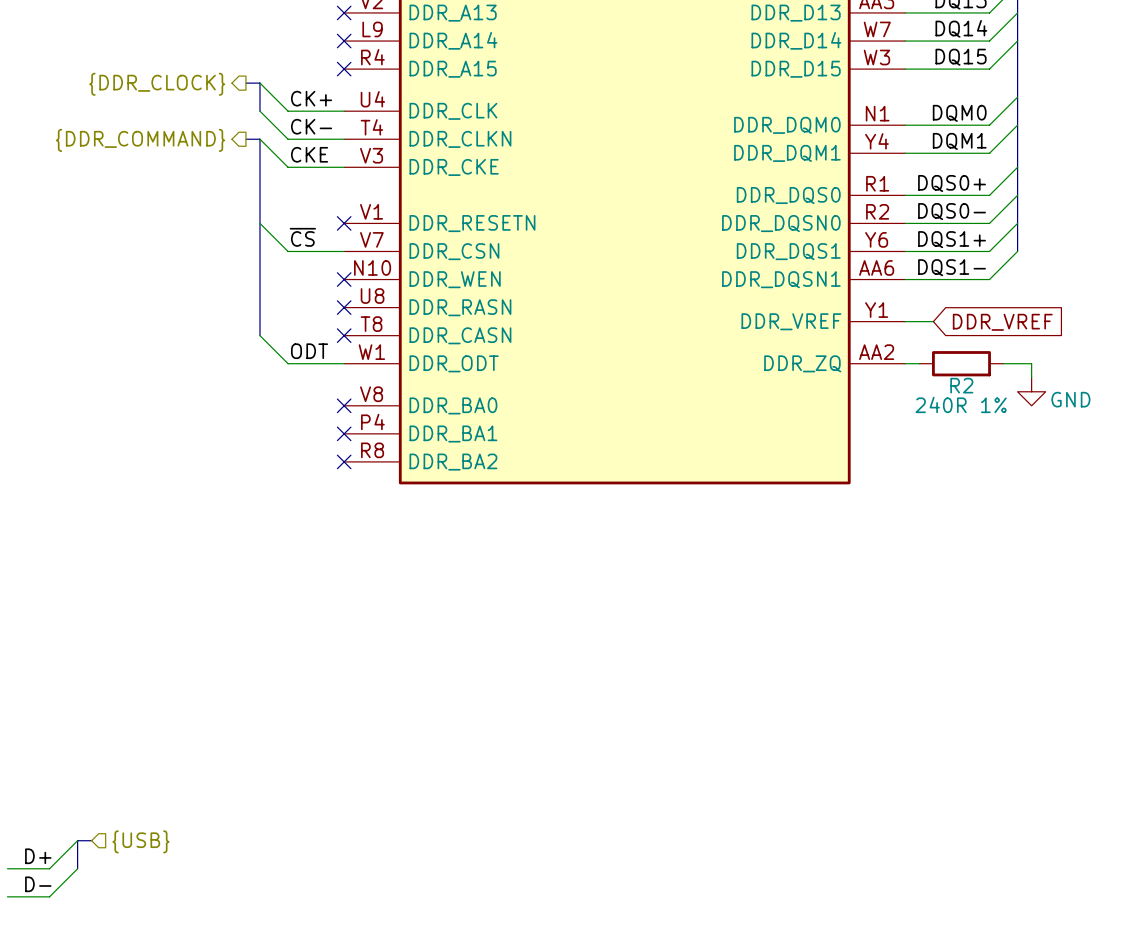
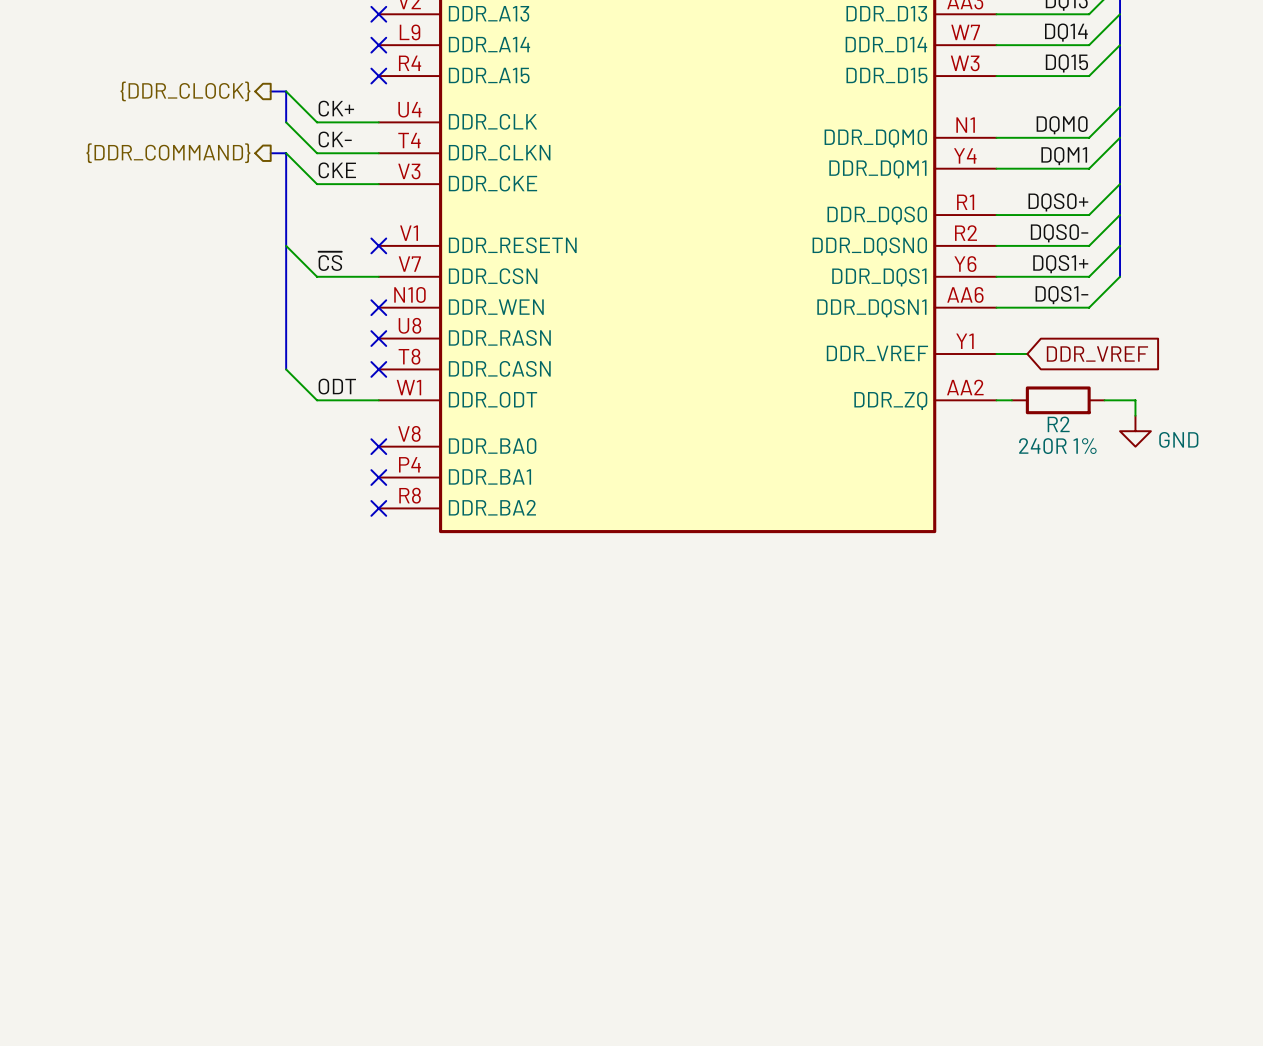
wire: (77, 840) (49, 868) (7, 868) -> none
bus: (91, 840) (77, 840) (77, 868) -> none
hierarchical label: {USB} (140, 841) -> none
label: D+ (38, 856) -> none
wire: (77, 868) (49, 896) (7, 896) -> none
label: D- (38, 884) -> none

